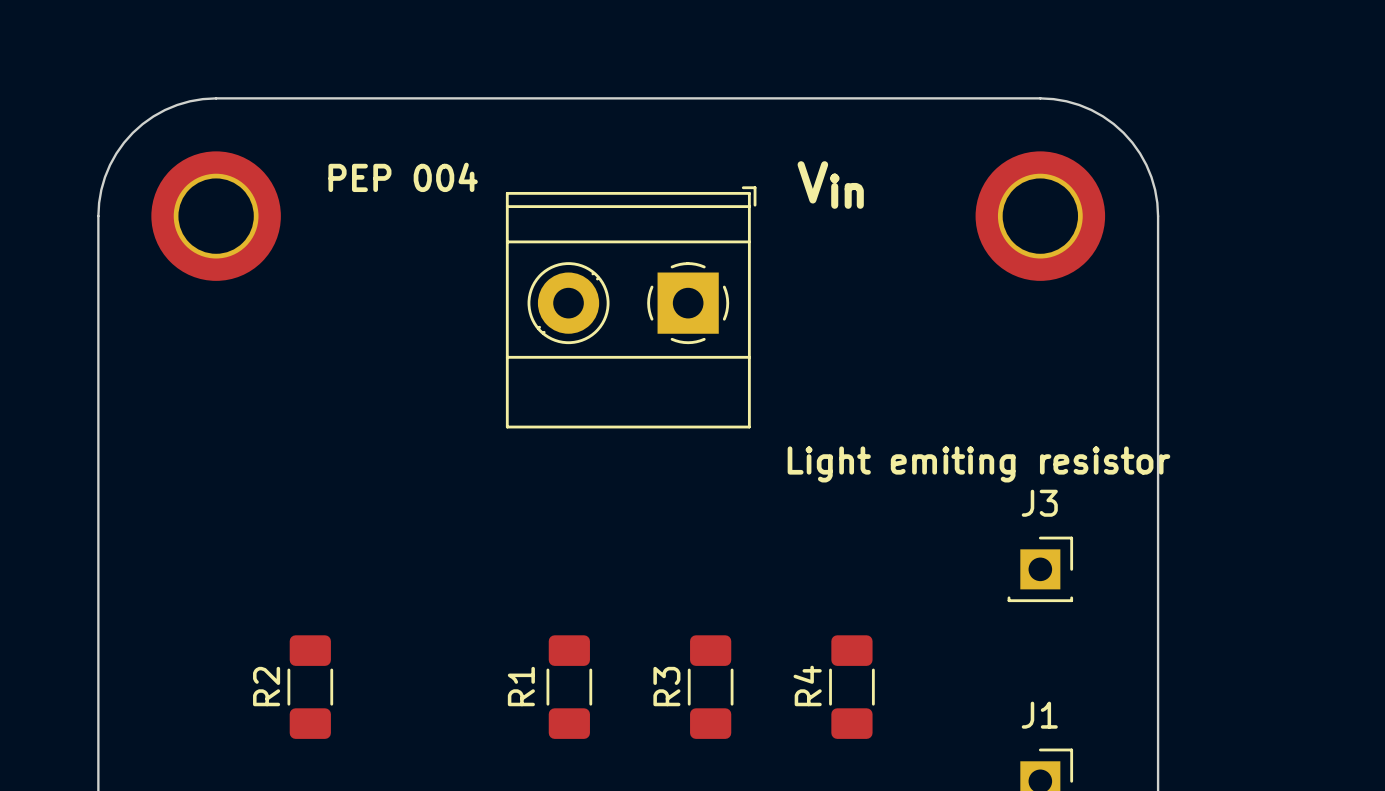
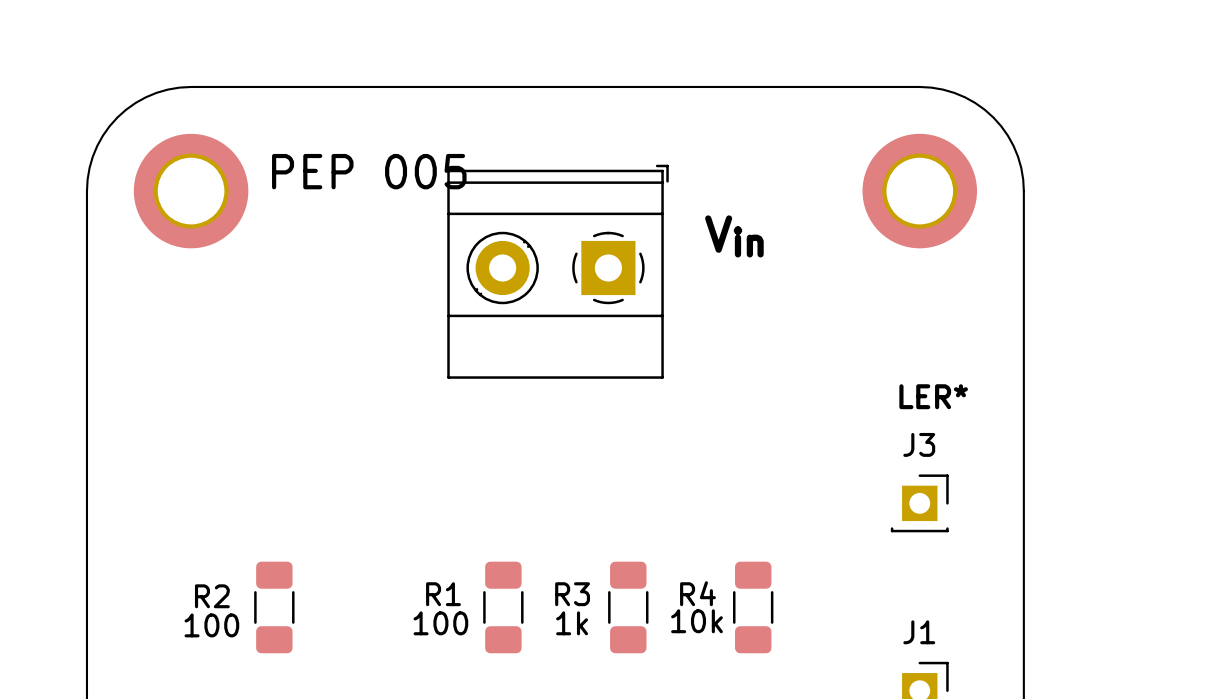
text: PEP 004 (403, 177) -> PEP 005 (369, 171)
text position: Vin (830, 185) -> Vin (734, 236)
text: none -> LER* (933, 396)
text: Light emiting resistor (978, 464) -> none
R4 name rotation: 0° (807, 685) -> 90° clockwise (697, 593)
R2 name rotation: 0° (266, 686) -> 90° clockwise (212, 596)
R1 name rotation: 0° (521, 686) -> 90° clockwise (443, 594)
R3 name rotation: 0° (666, 686) -> 90° clockwise (572, 594)
R4 value: none -> 10k (696, 621)
R1 value: none -> 100 (440, 623)
R3 value: none -> 1k (572, 623)
R2 value: none -> 100 (211, 625)

